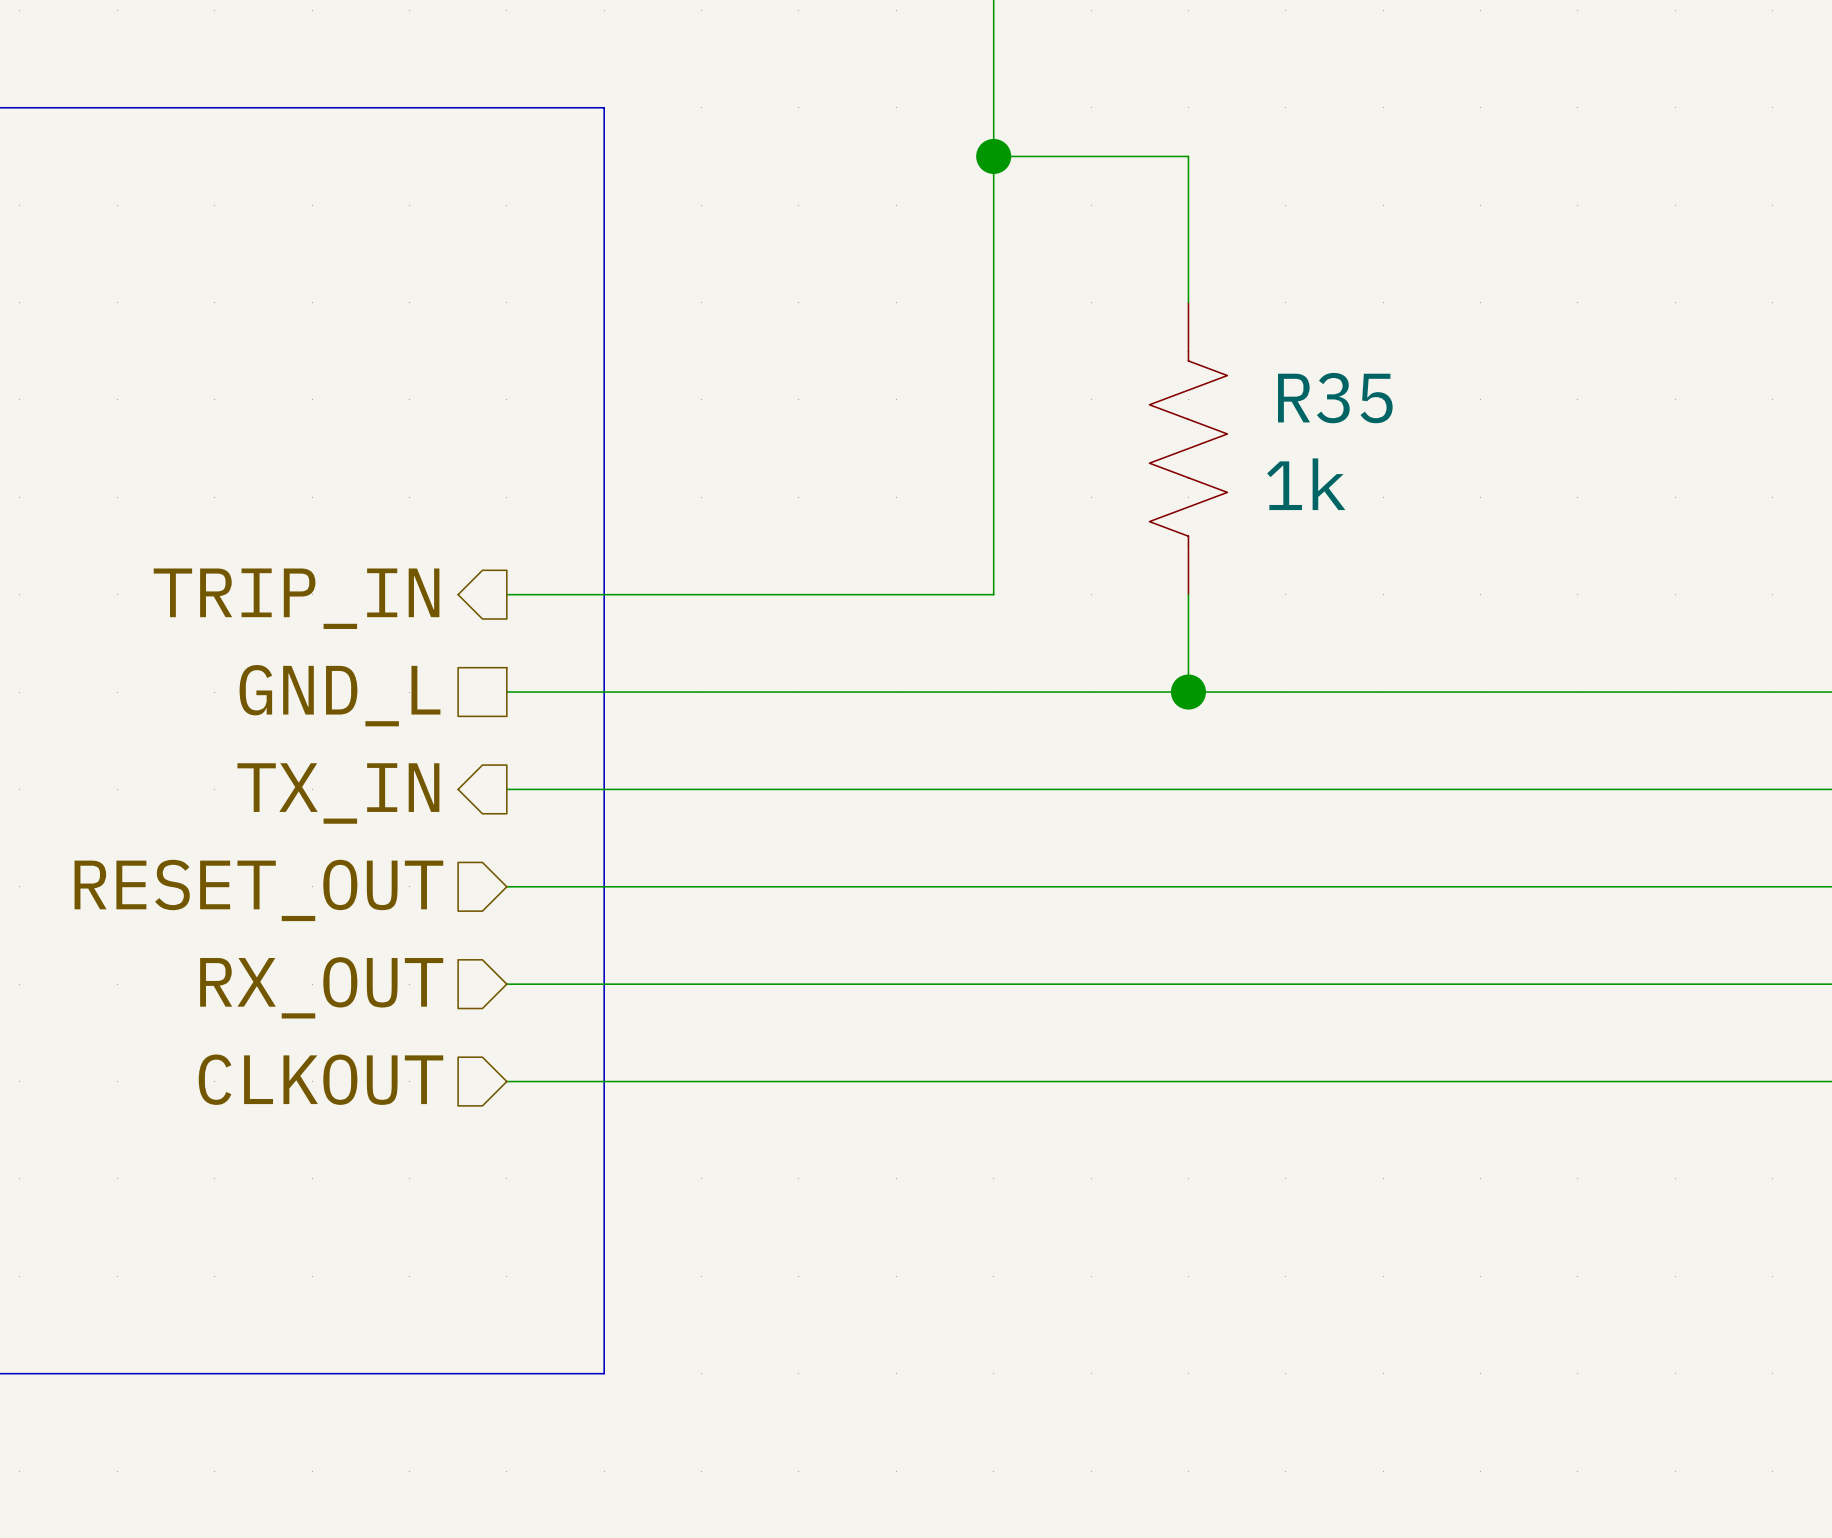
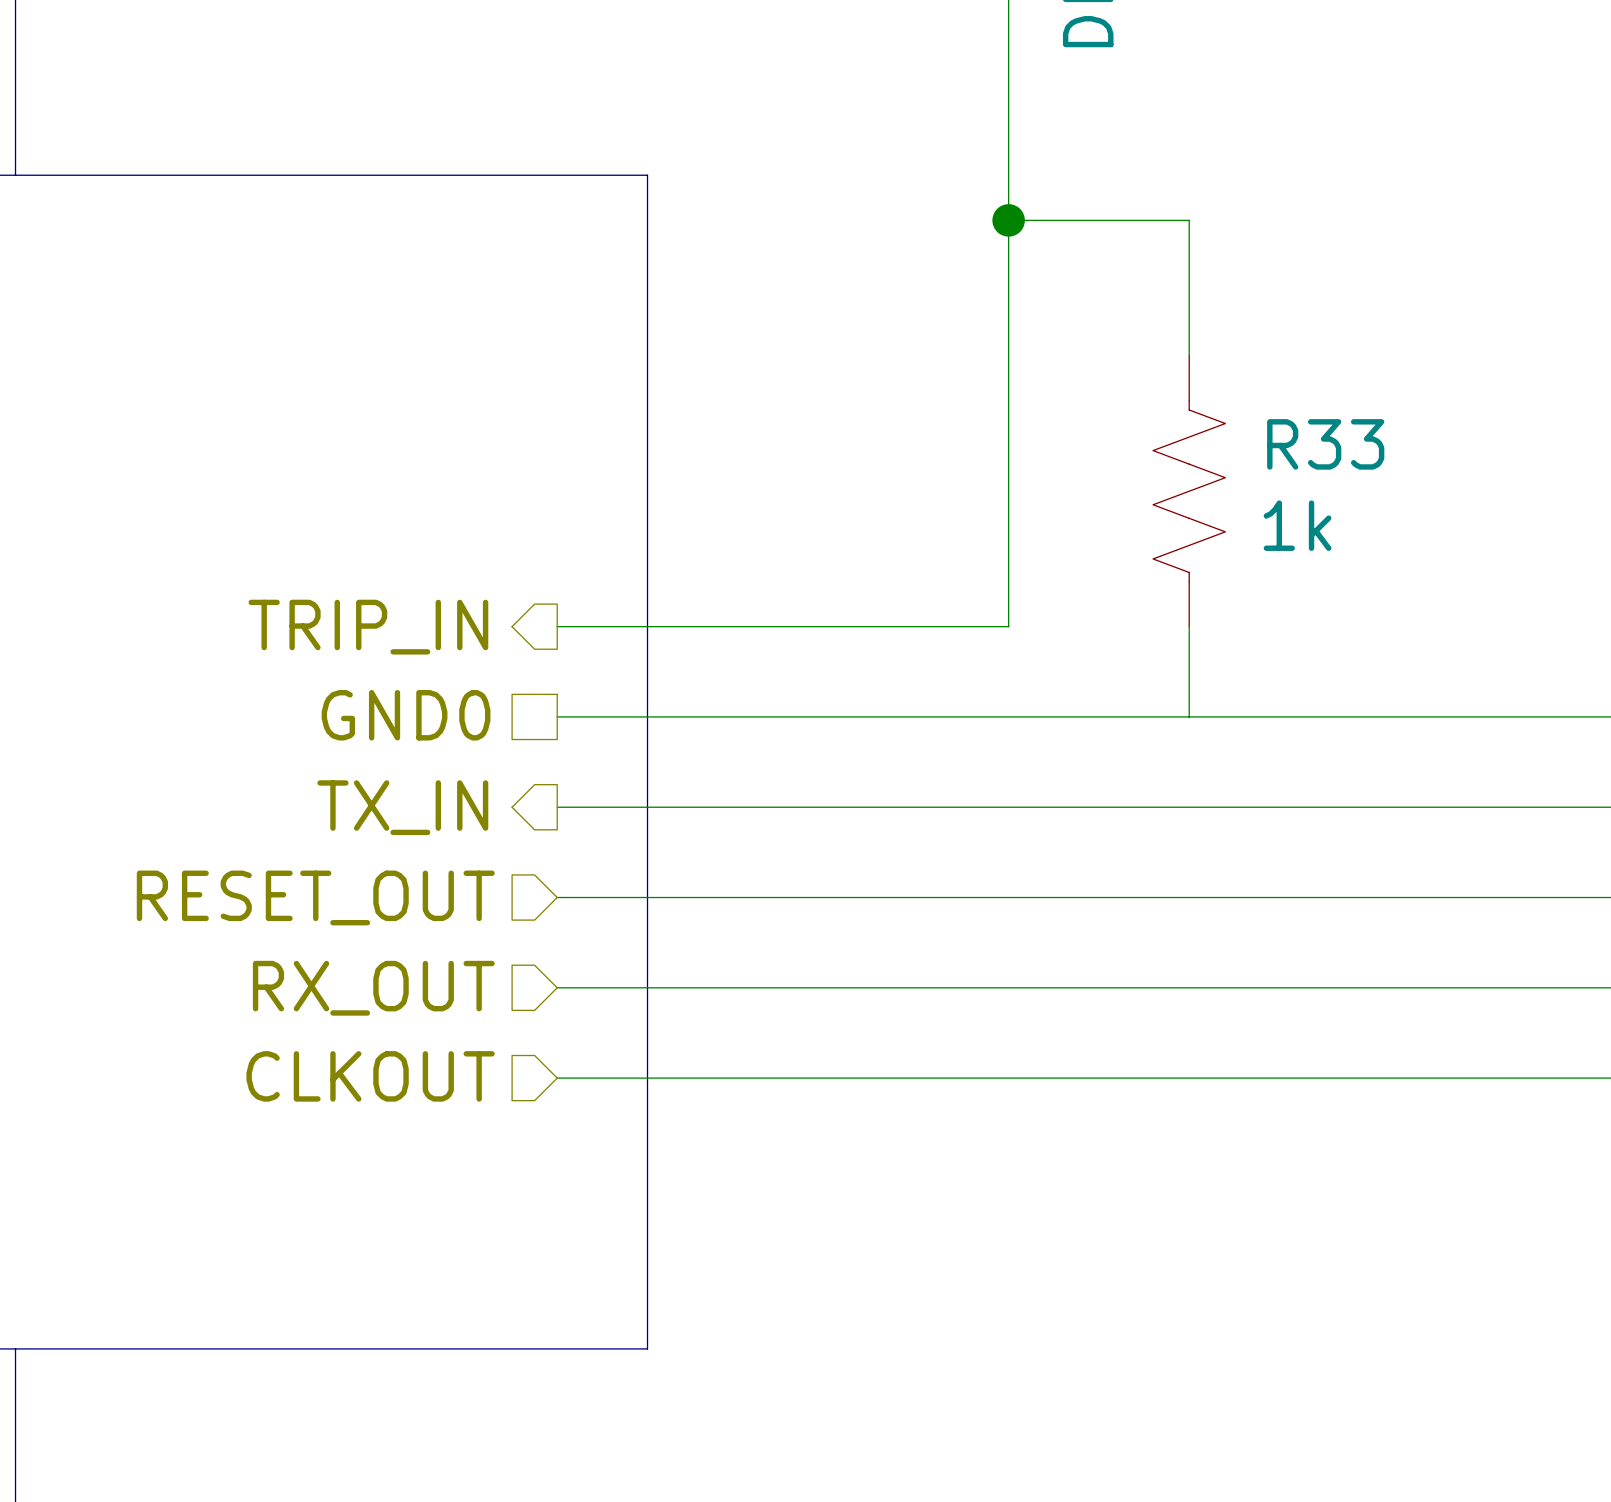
R35 name: R35 (1335, 398) -> R33 (1325, 444)
junction: (1188, 692) -> none
hierarchical label: GND_L (340, 695) -> GND0 (406, 715)

